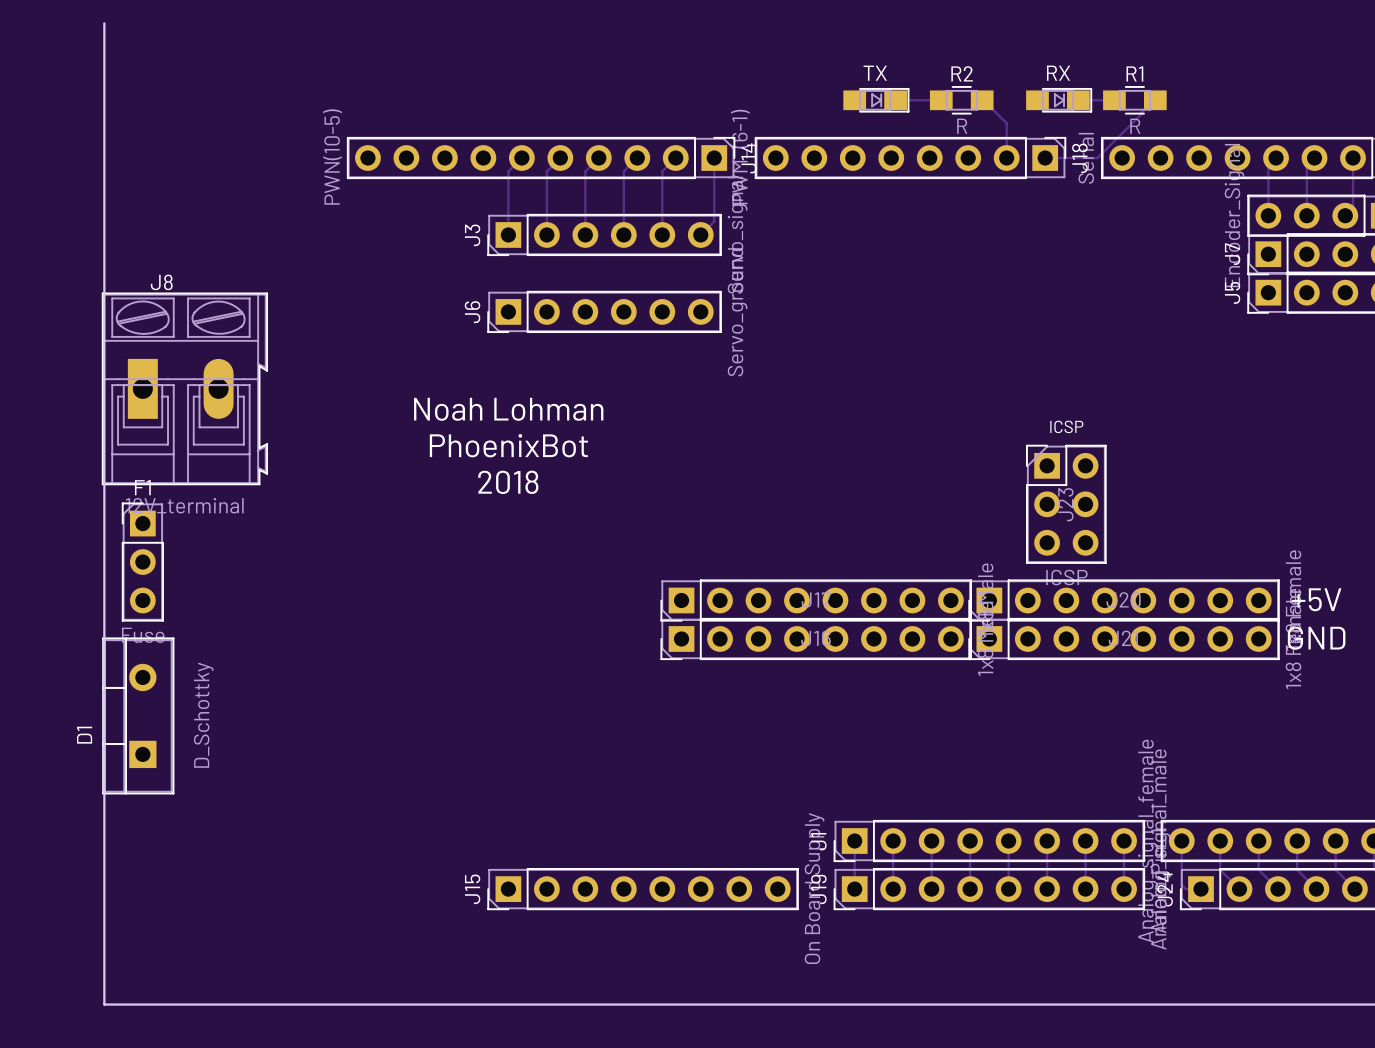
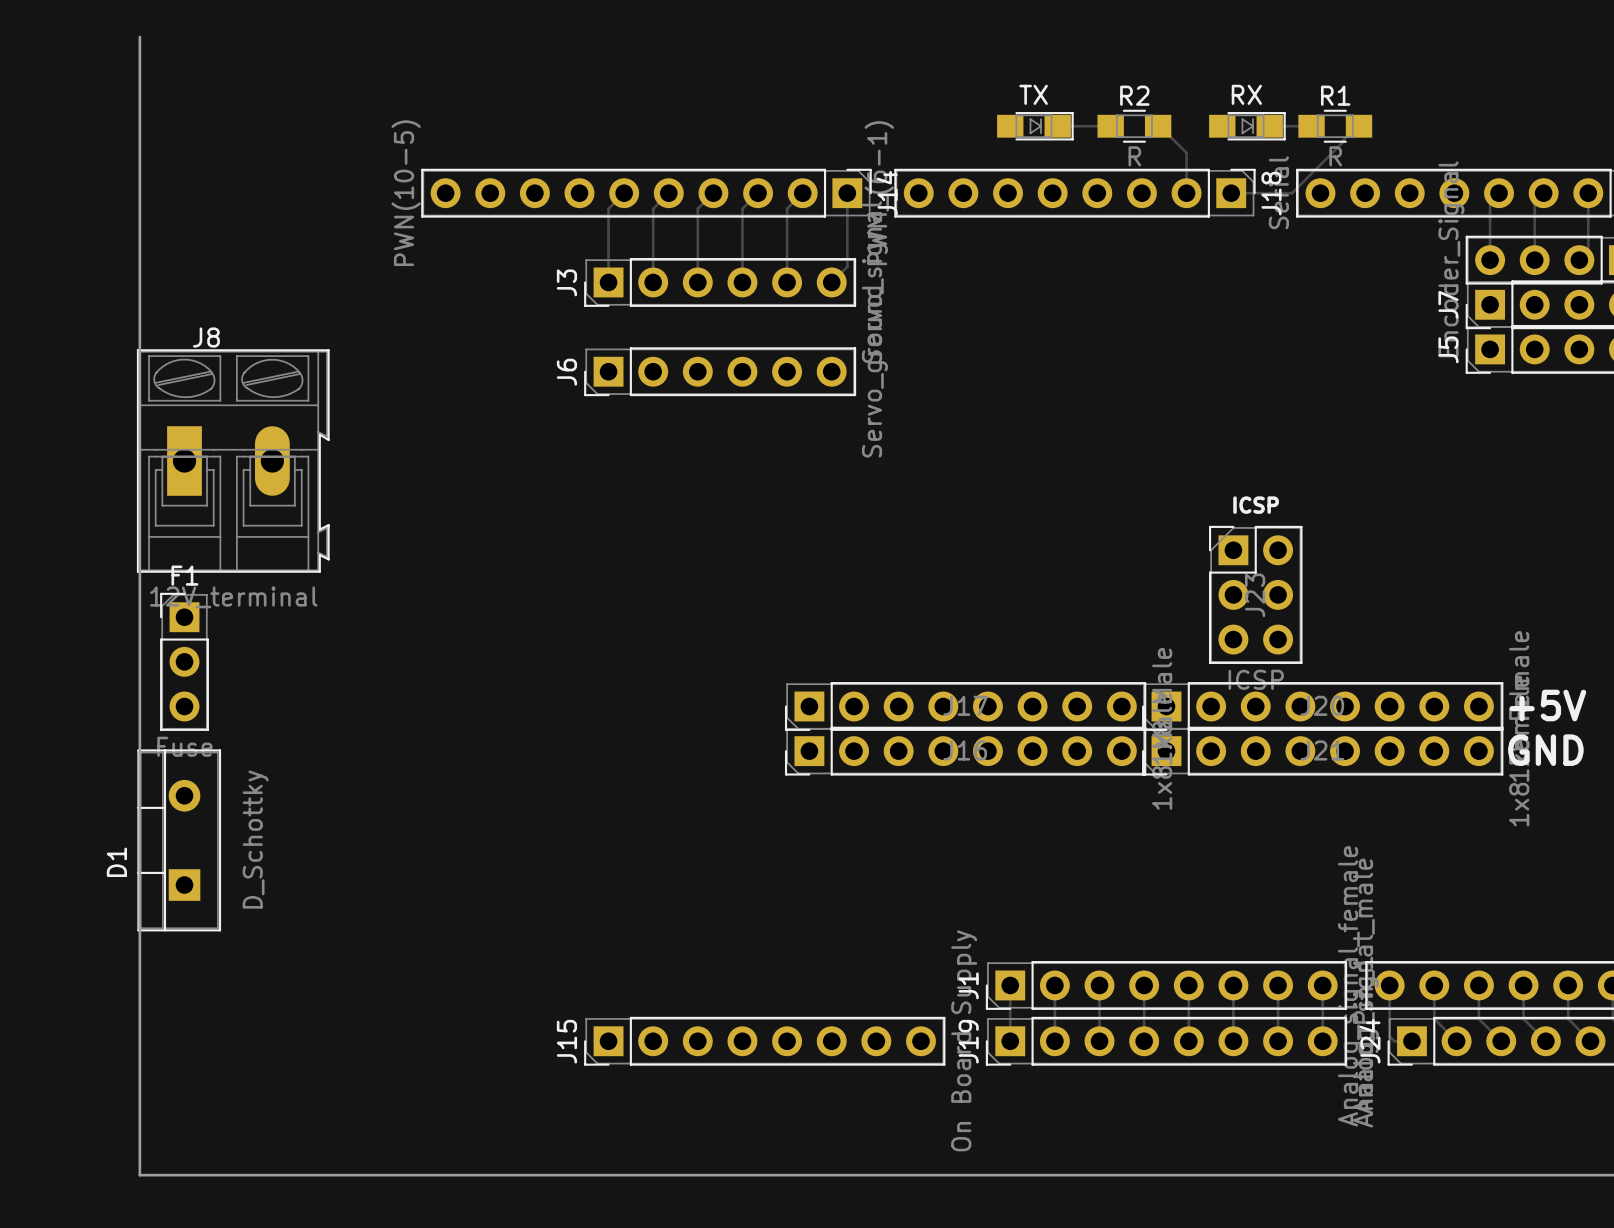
text: Noah Lohman (508, 409) -> none
text: PhoenixBot (508, 445) -> none
text: 2018 (508, 482) -> none

